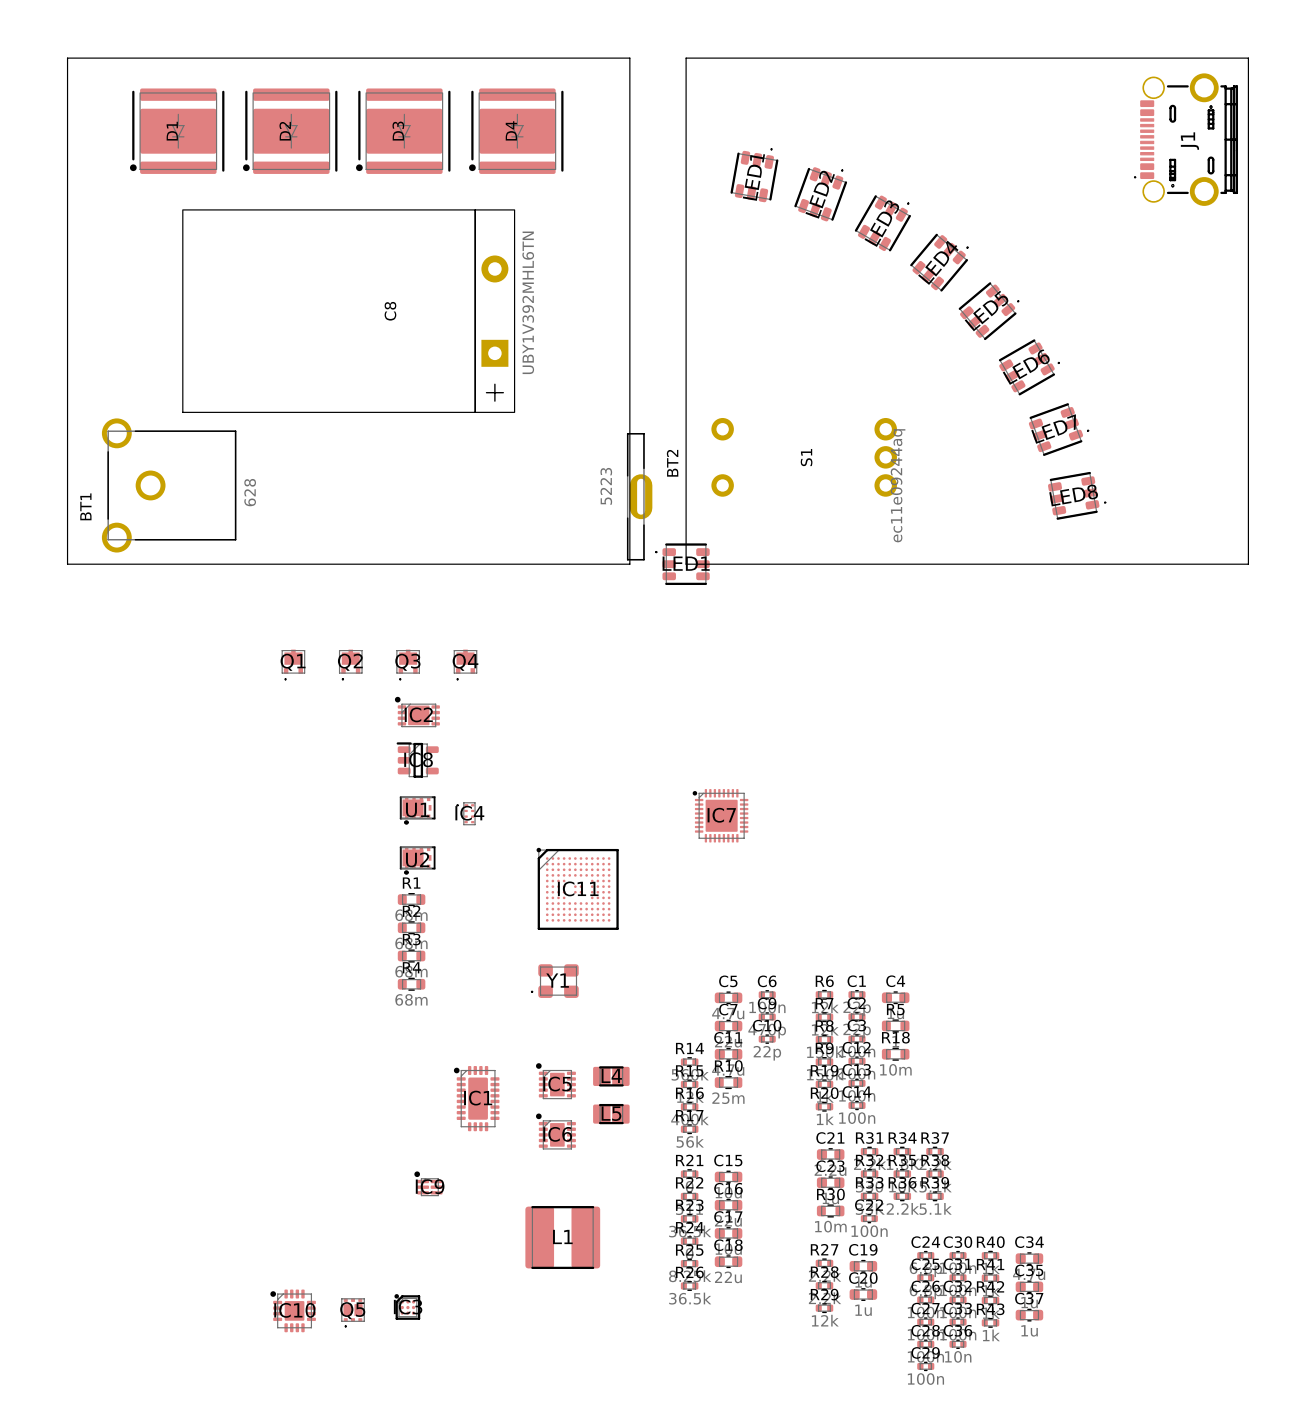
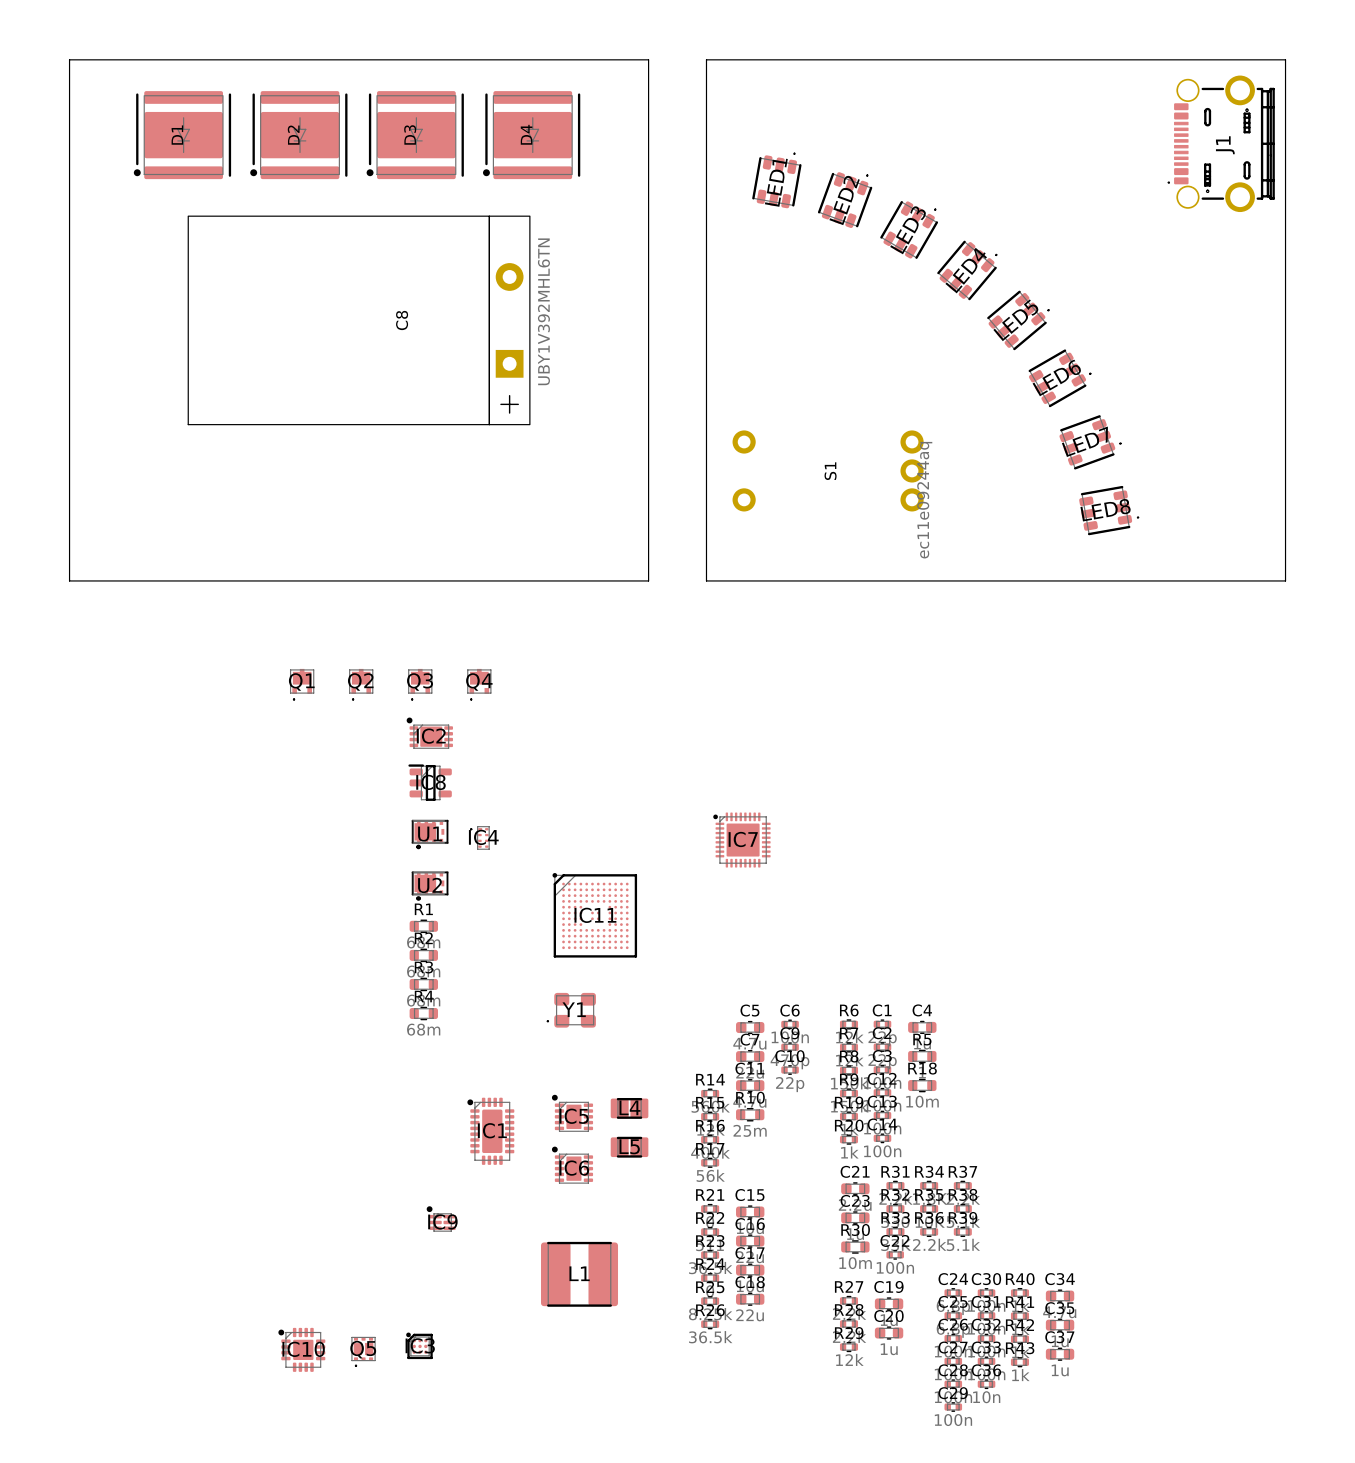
BT1: 628 (169, 485) -> none
BT2: 5223 (639, 496) -> none
LED1: (682, 564) -> none

